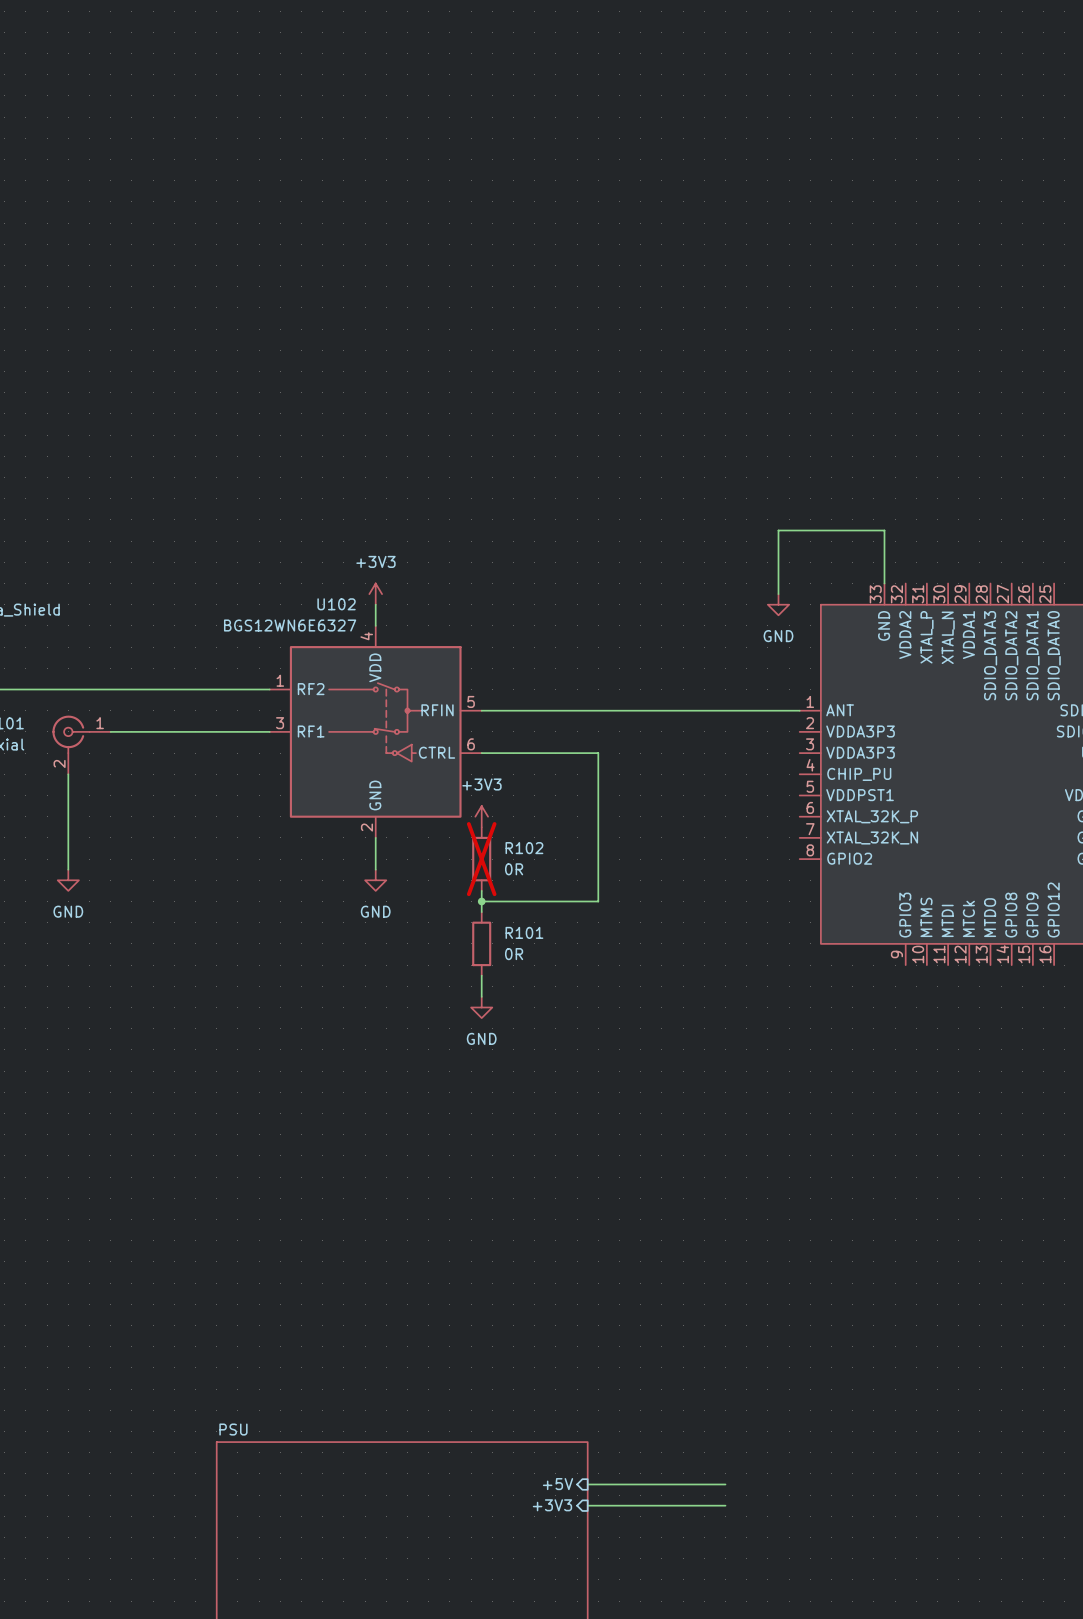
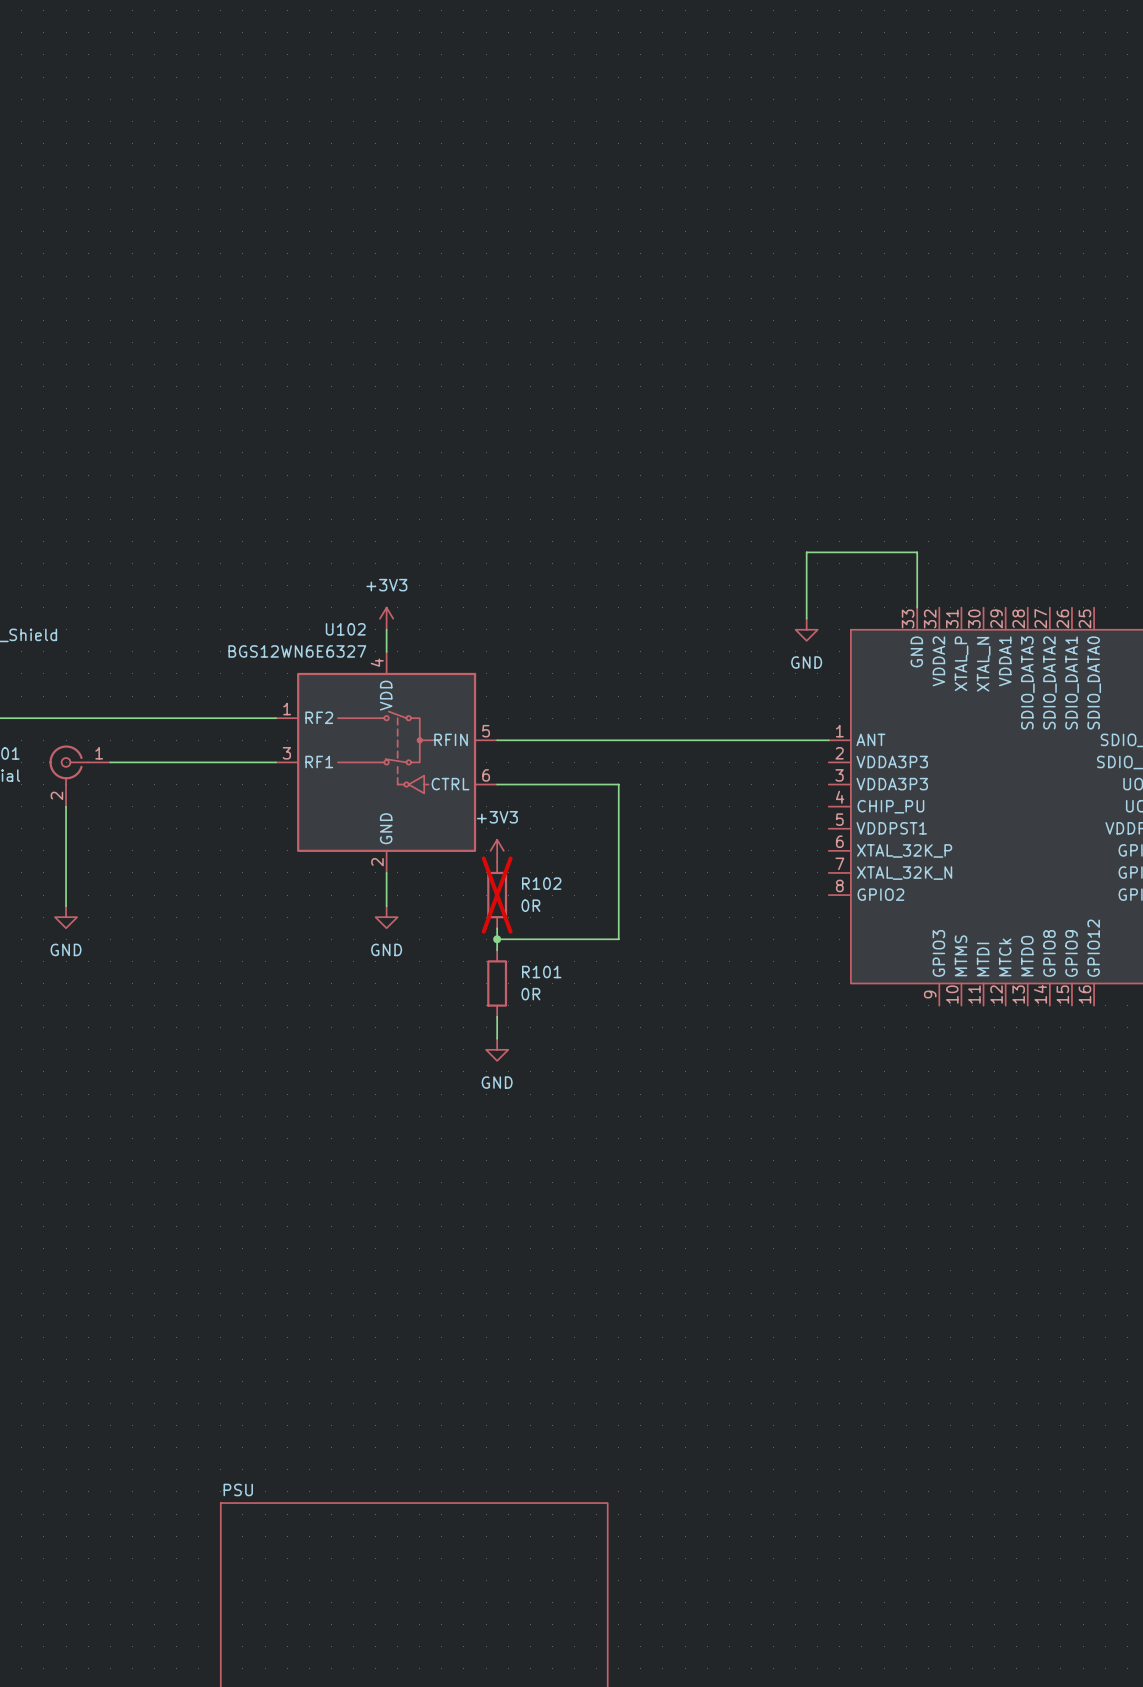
sheet pin: +5V (558, 1484) -> none
wire: (587, 1484) (725, 1484) -> none
sheet pin: +3V3 (552, 1505) -> none
wire: (587, 1505) (725, 1505) -> none

